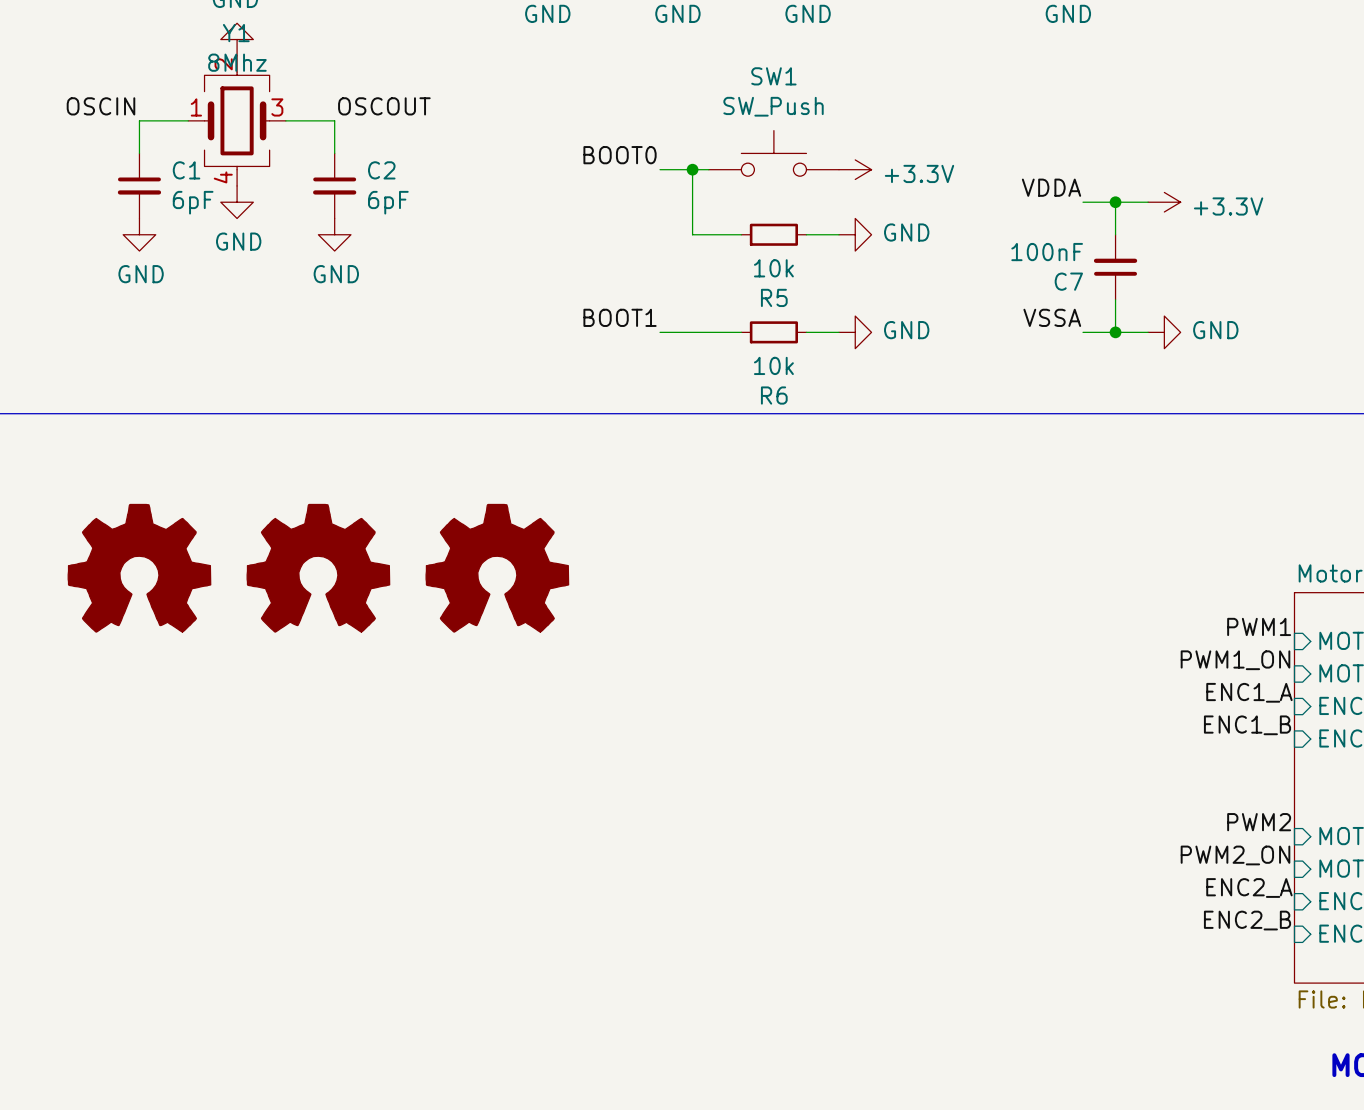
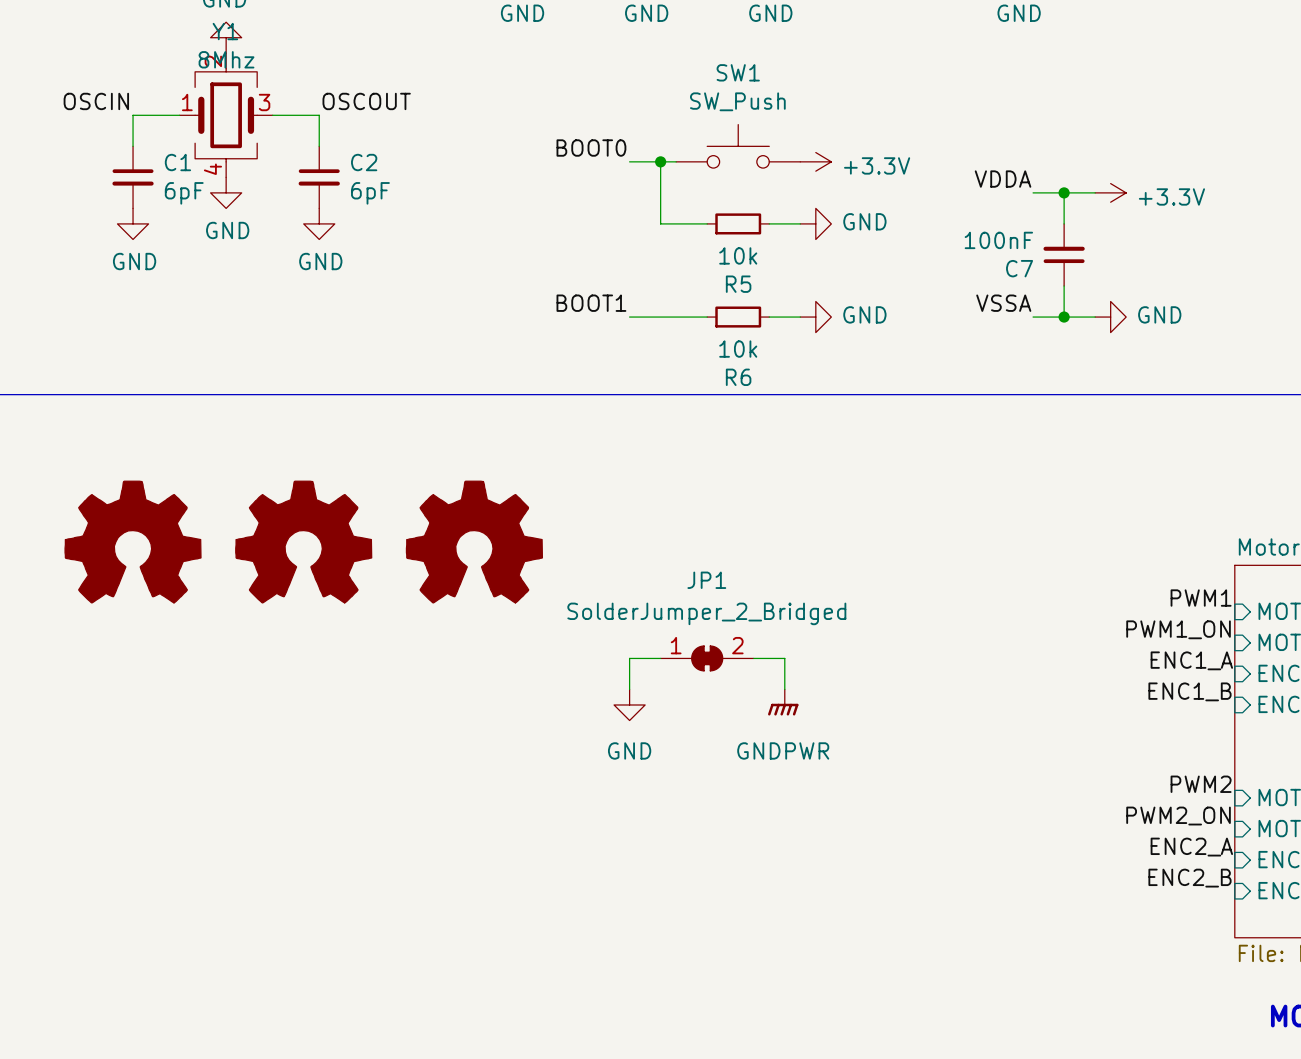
wire: none -> (660, 658) (629, 658) (629, 689)
JP1: none -> SolderJumper_2_Bridged (707, 658)
wire: none -> (753, 658) (784, 658) (784, 689)
power symbol: none -> GNDPWR (783, 702)
power symbol: none -> GND (629, 704)

